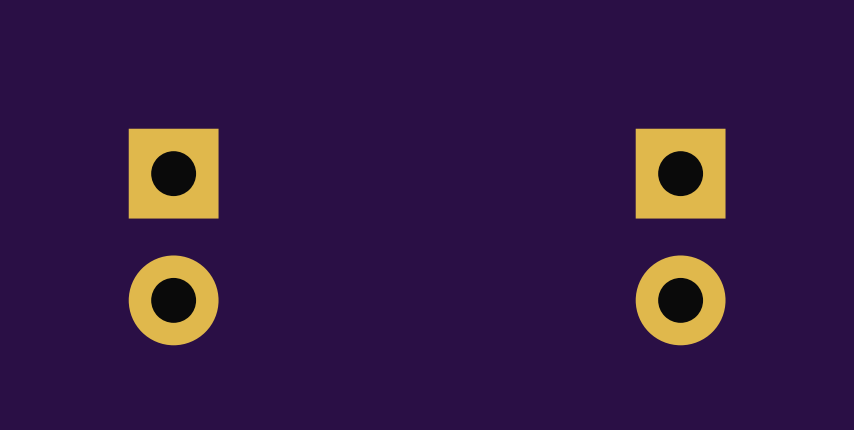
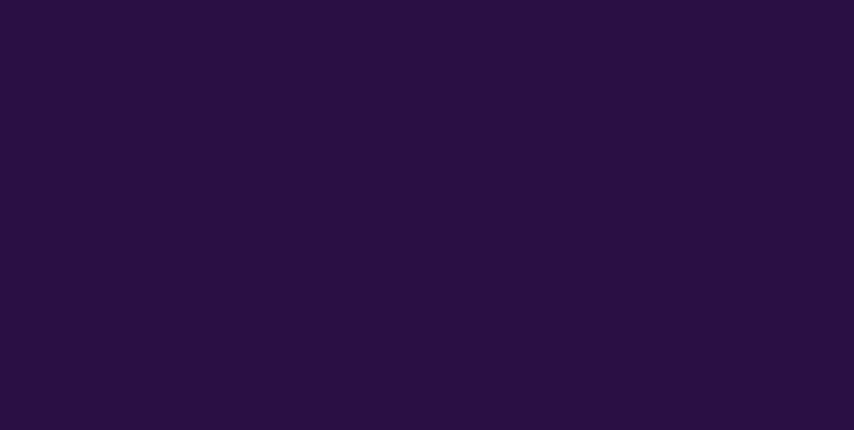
part: (173, 237) -> none
part: (680, 237) -> none

